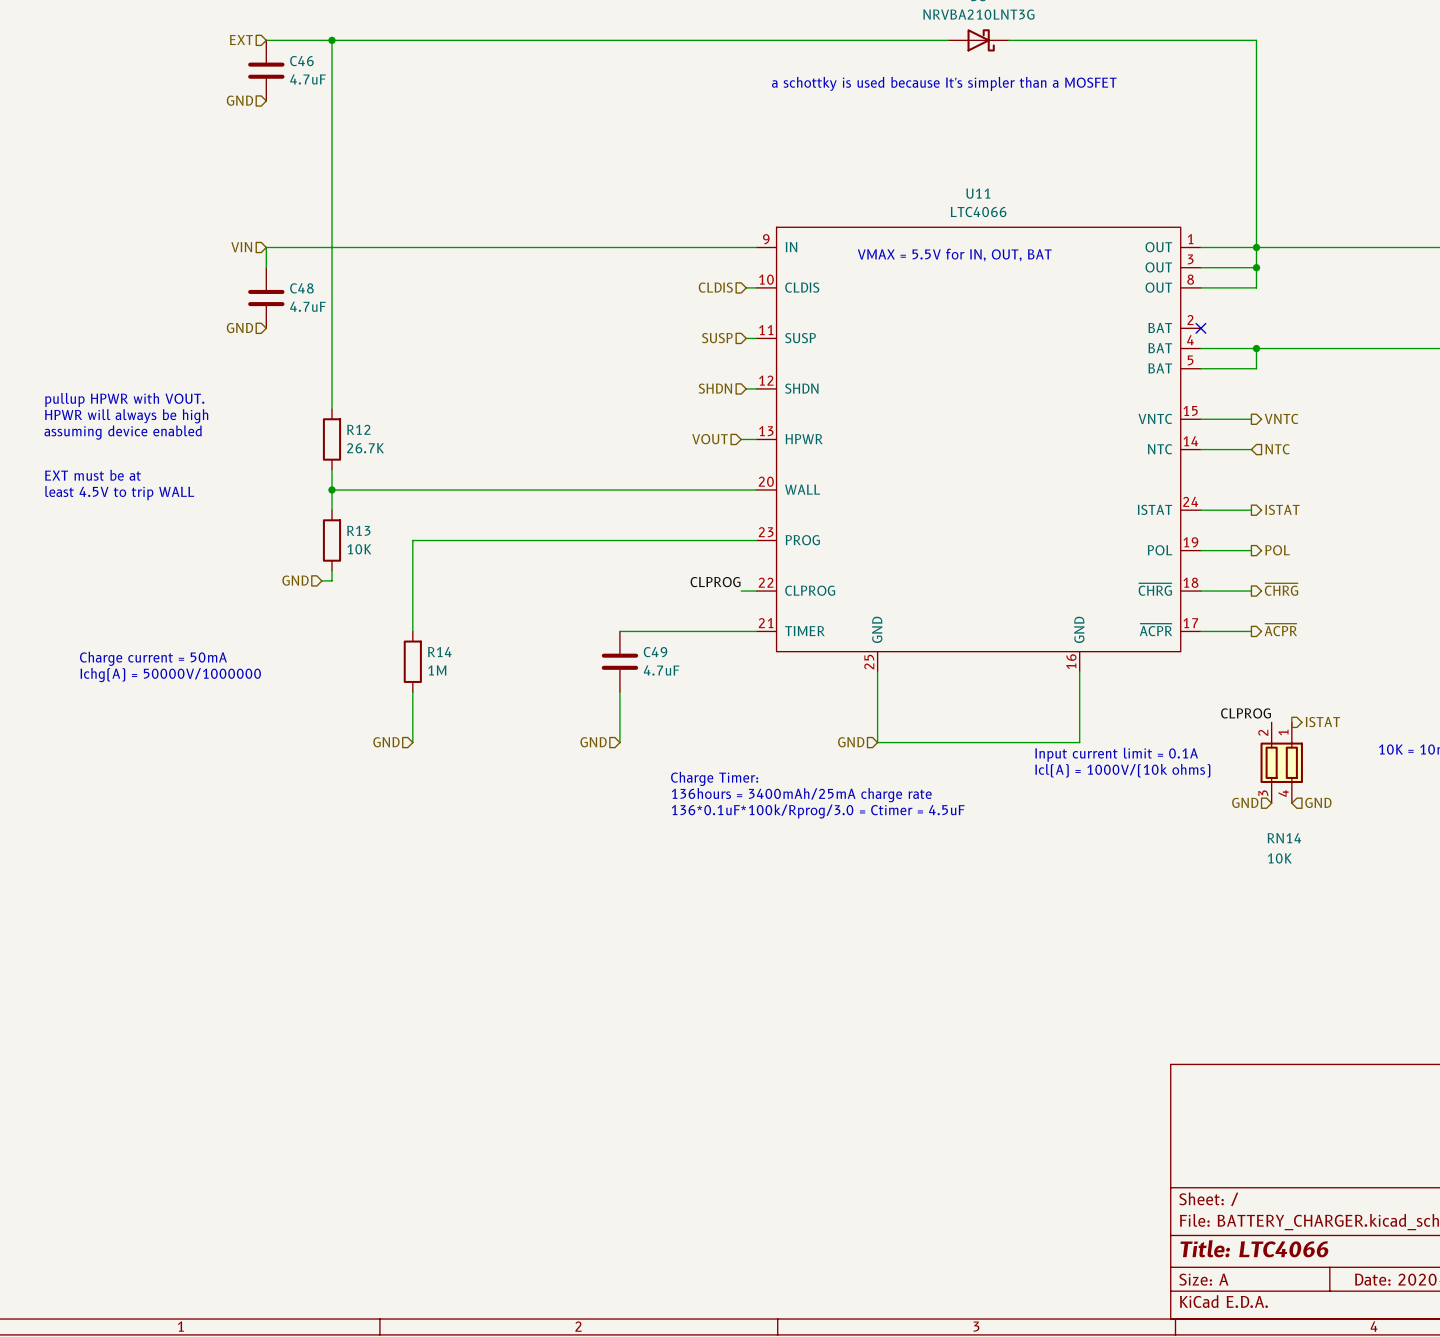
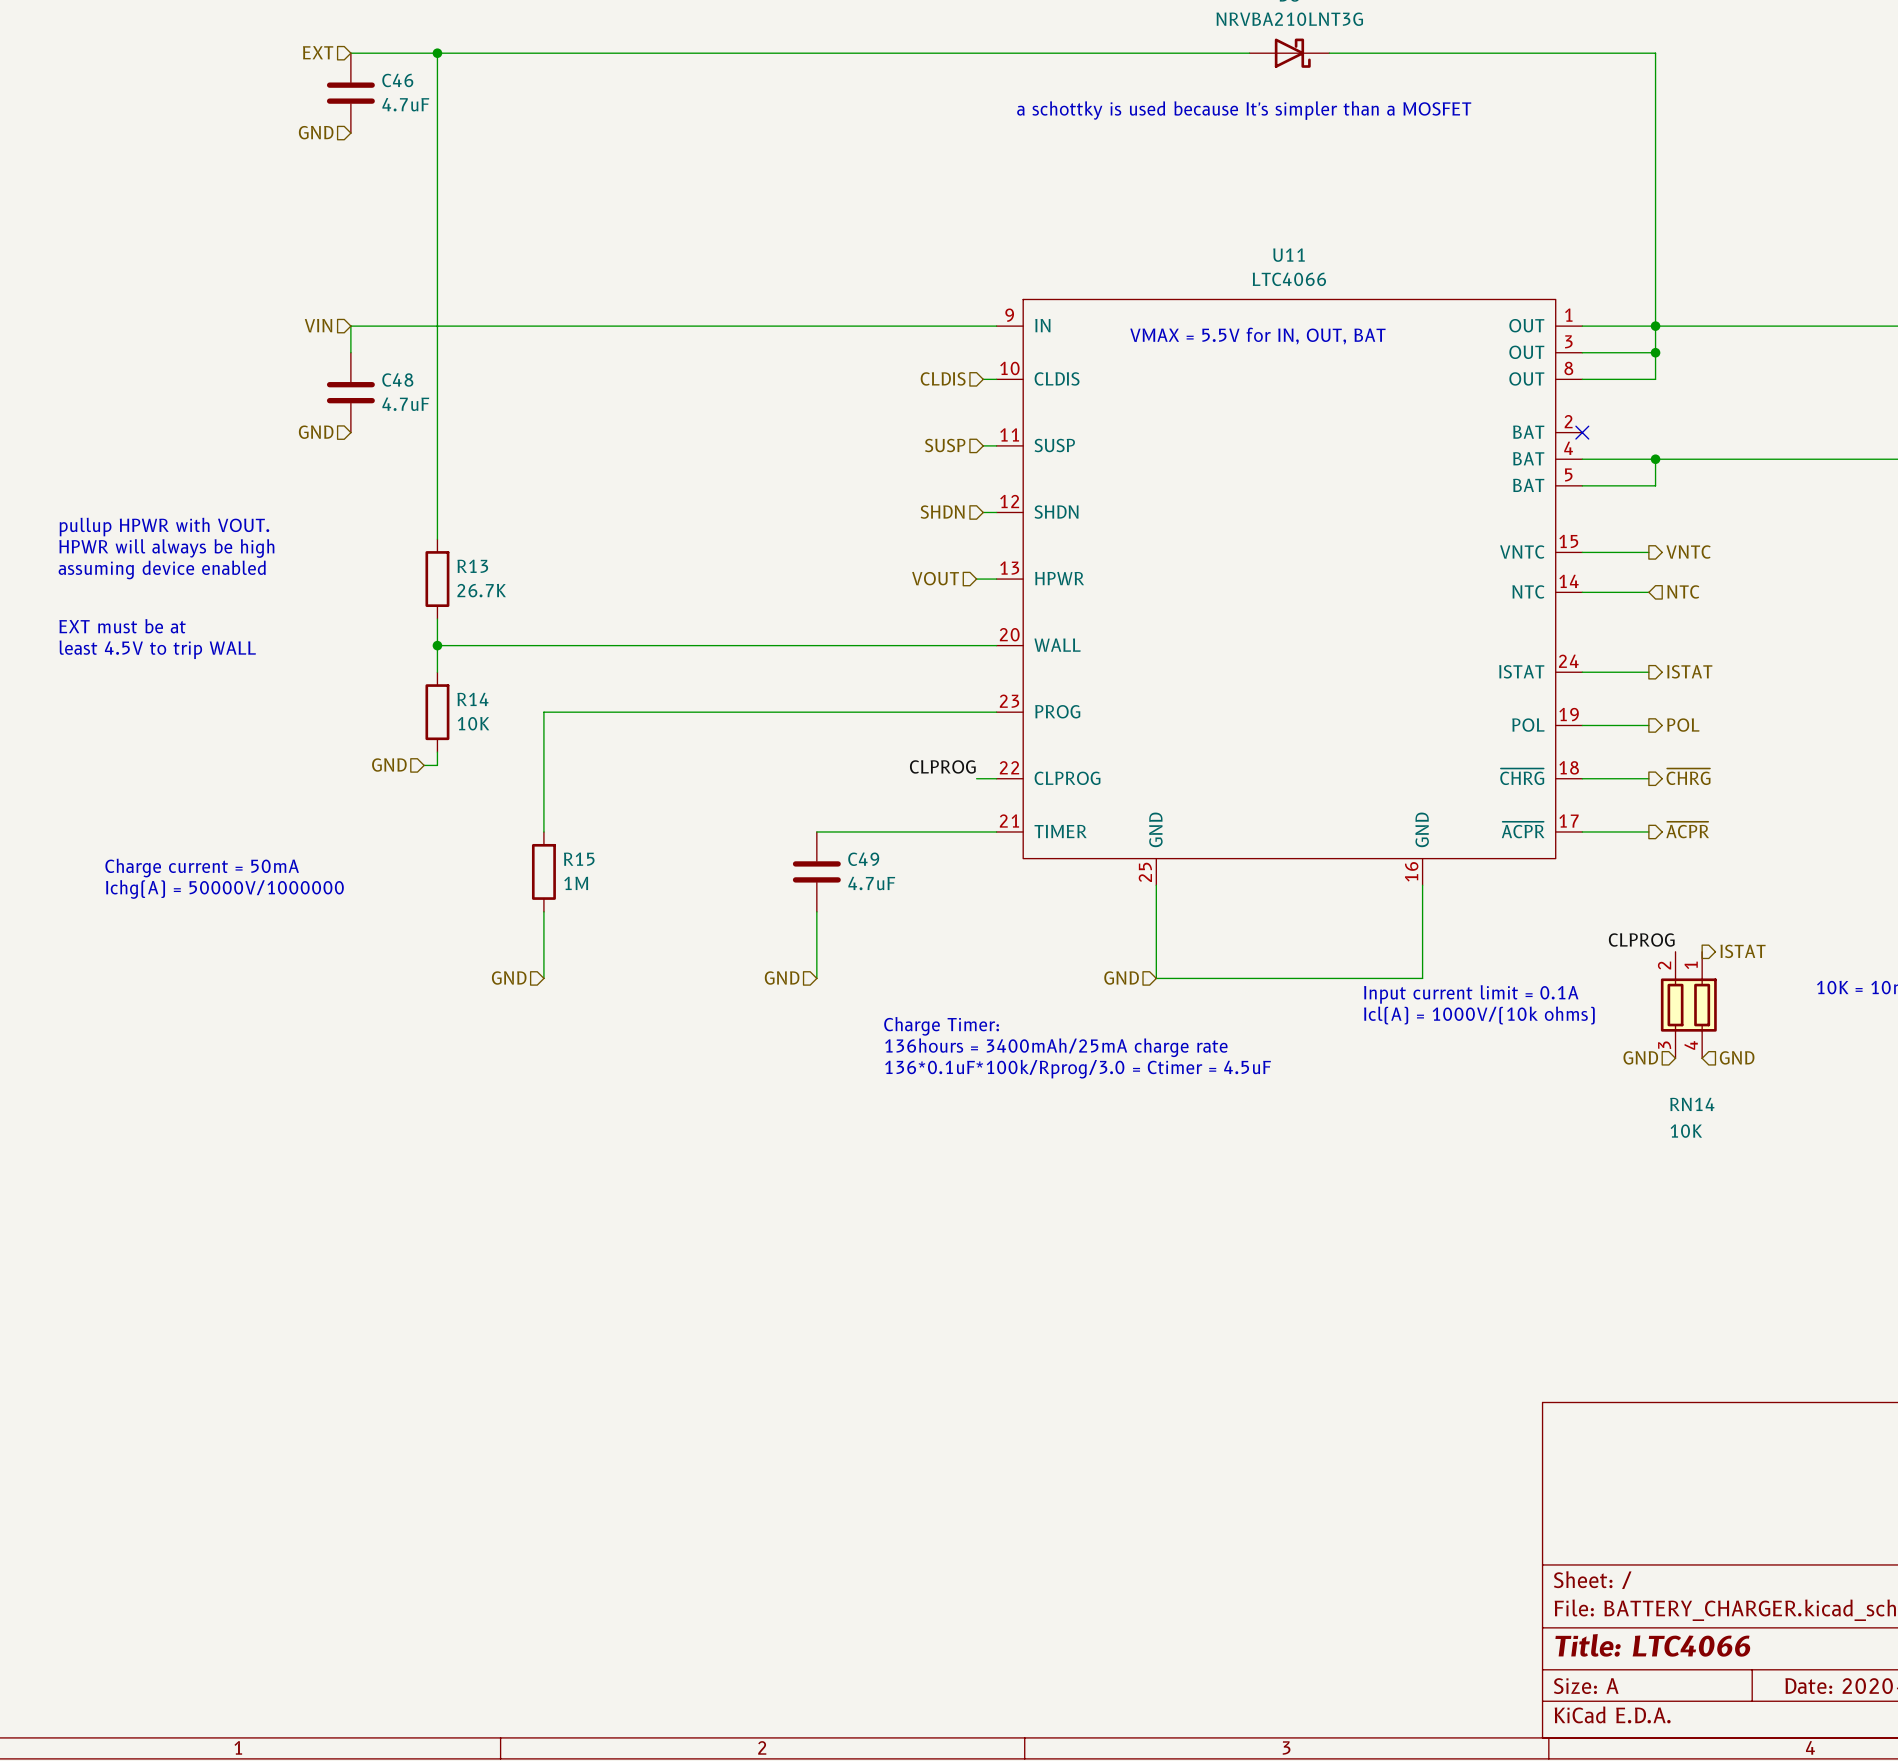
R12 name: R12 (358, 429) -> R13 (472, 566)
R13 name: R13 (358, 530) -> R14 (472, 699)
R14 name: R14 (439, 652) -> R15 (579, 859)

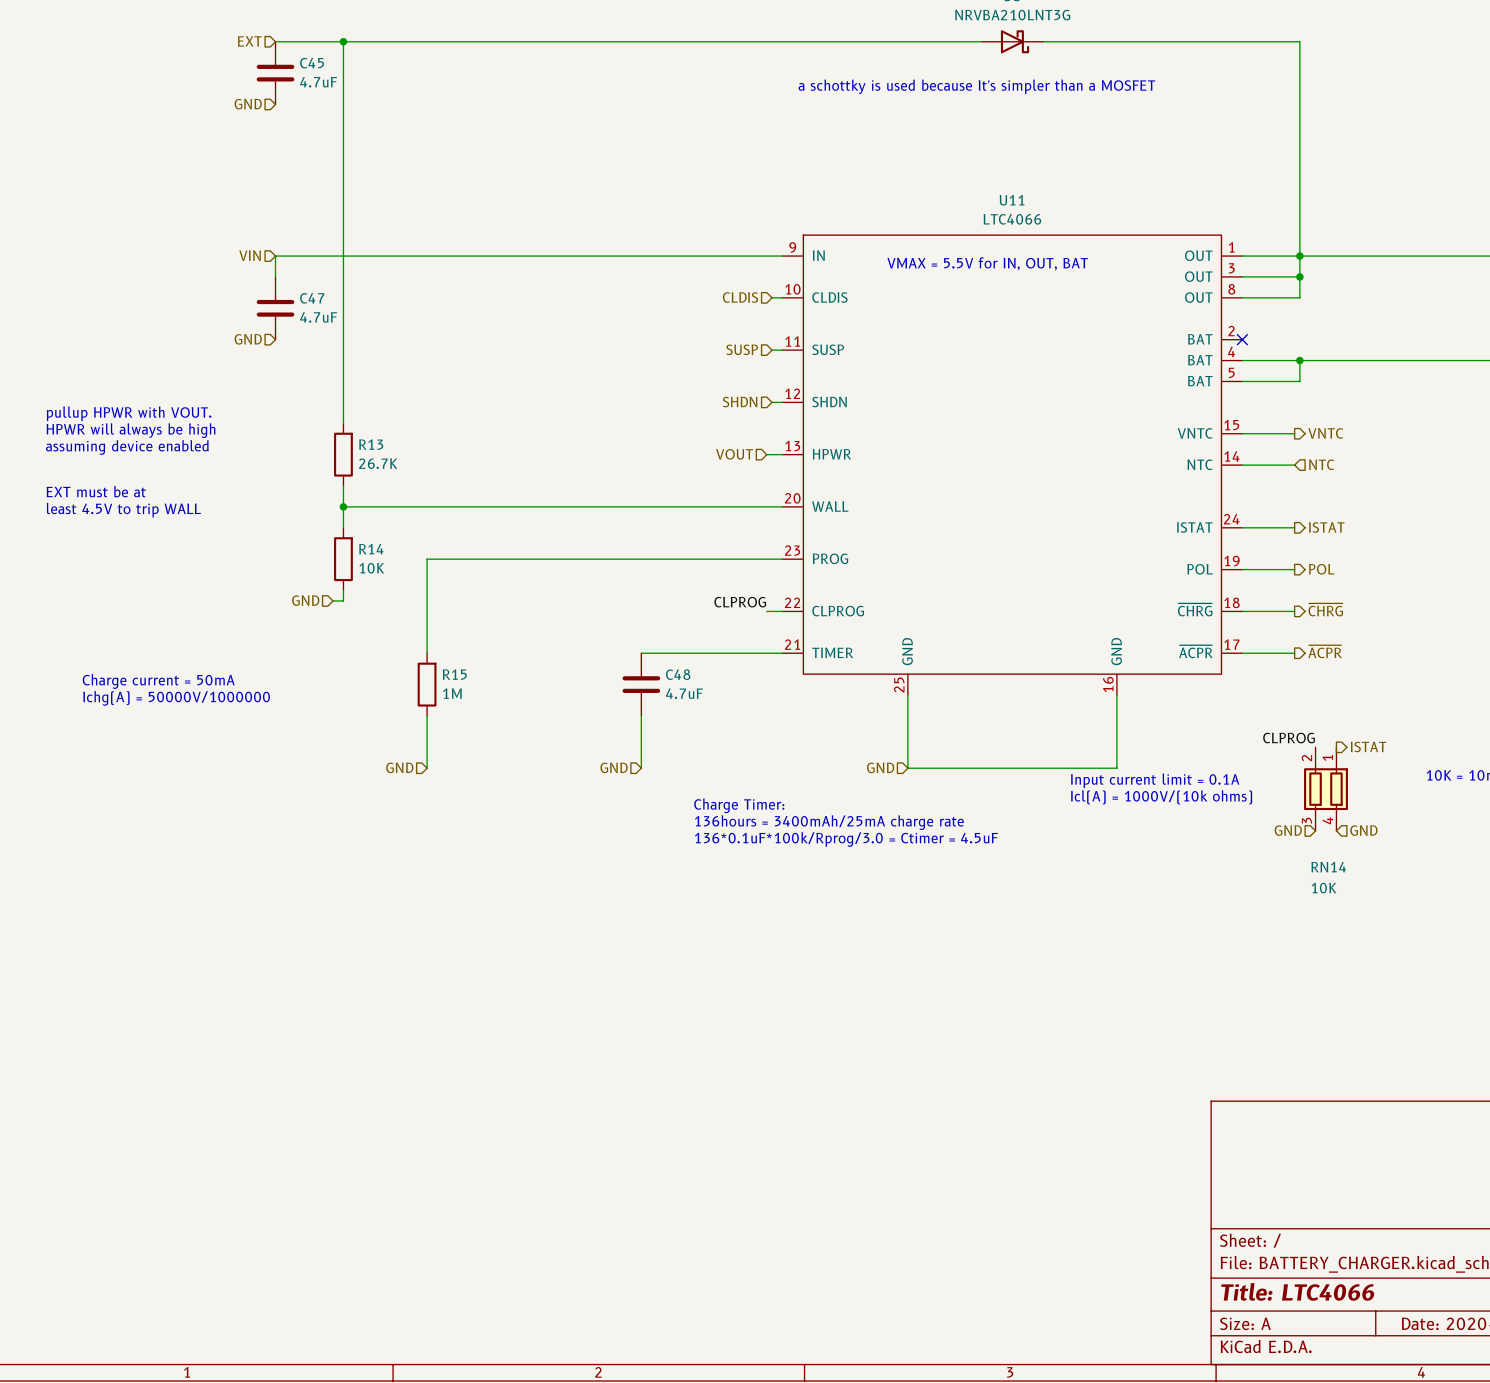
C46 name: C46 (397, 80) -> C45 (312, 63)
C48 name: C48 (397, 380) -> C47 (312, 298)
C49 name: C49 (863, 859) -> C48 (678, 674)

